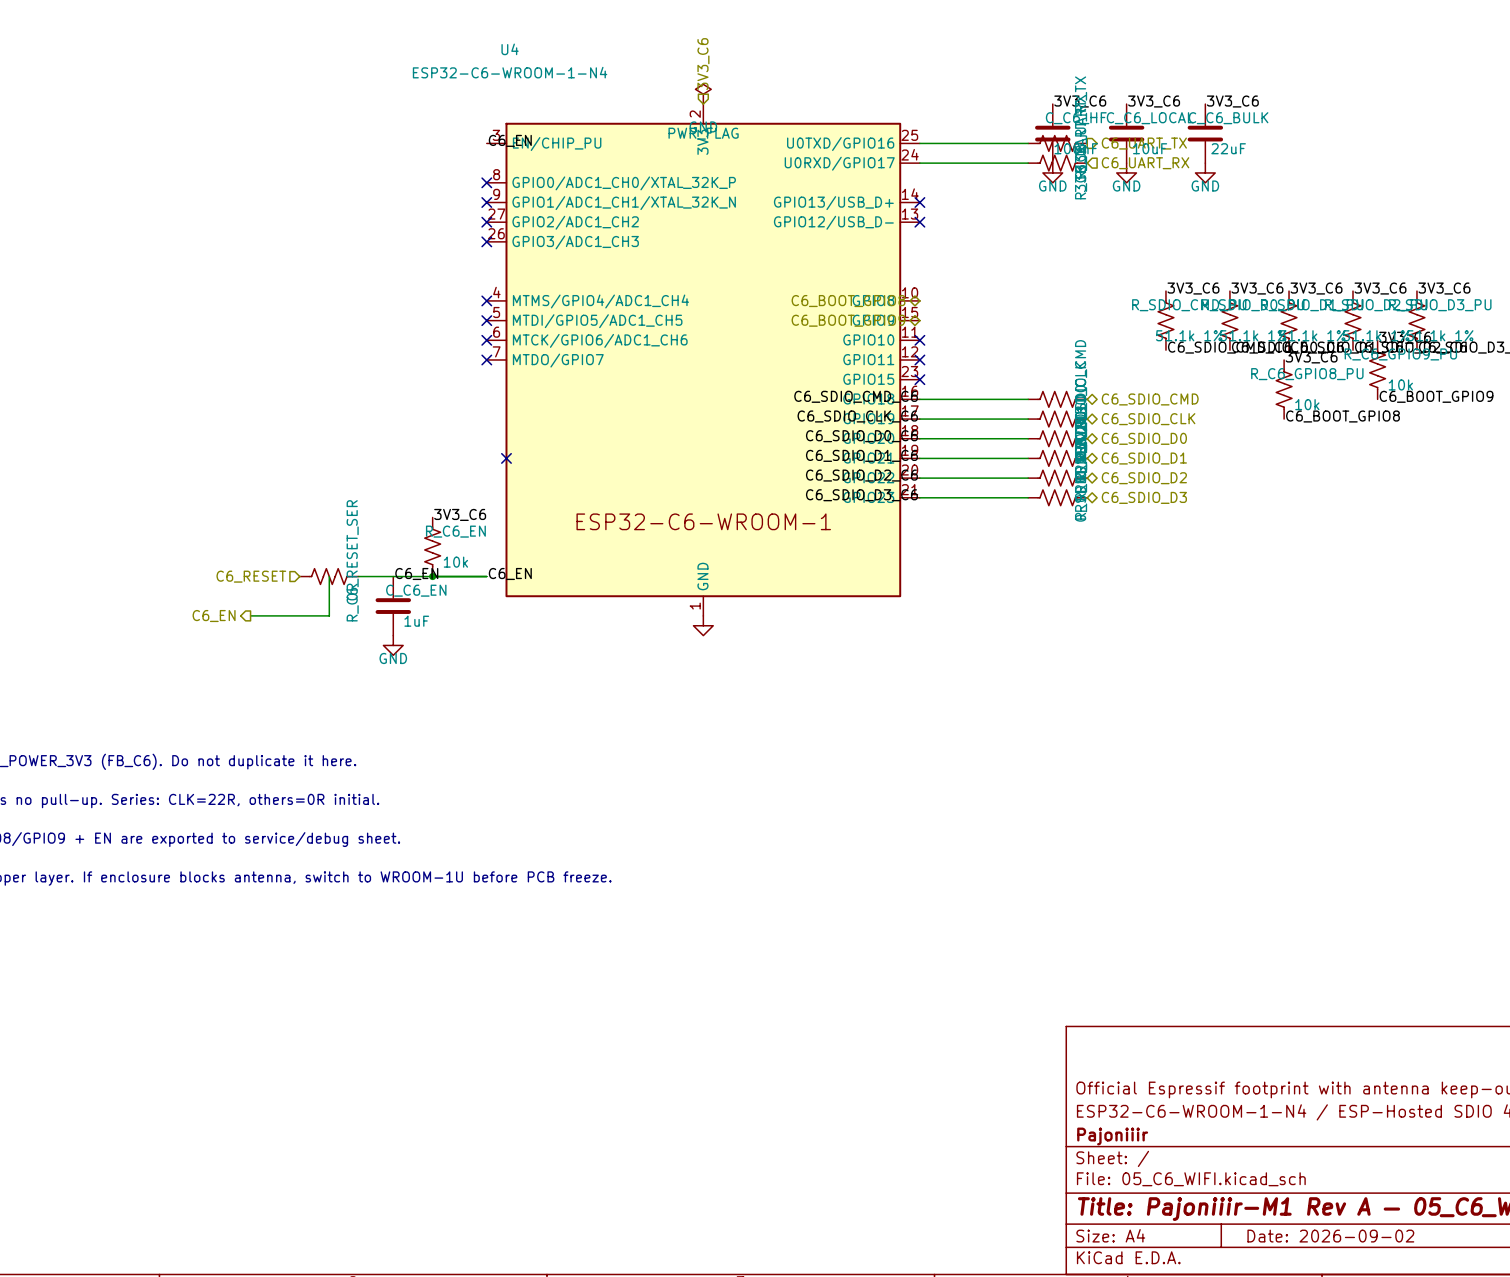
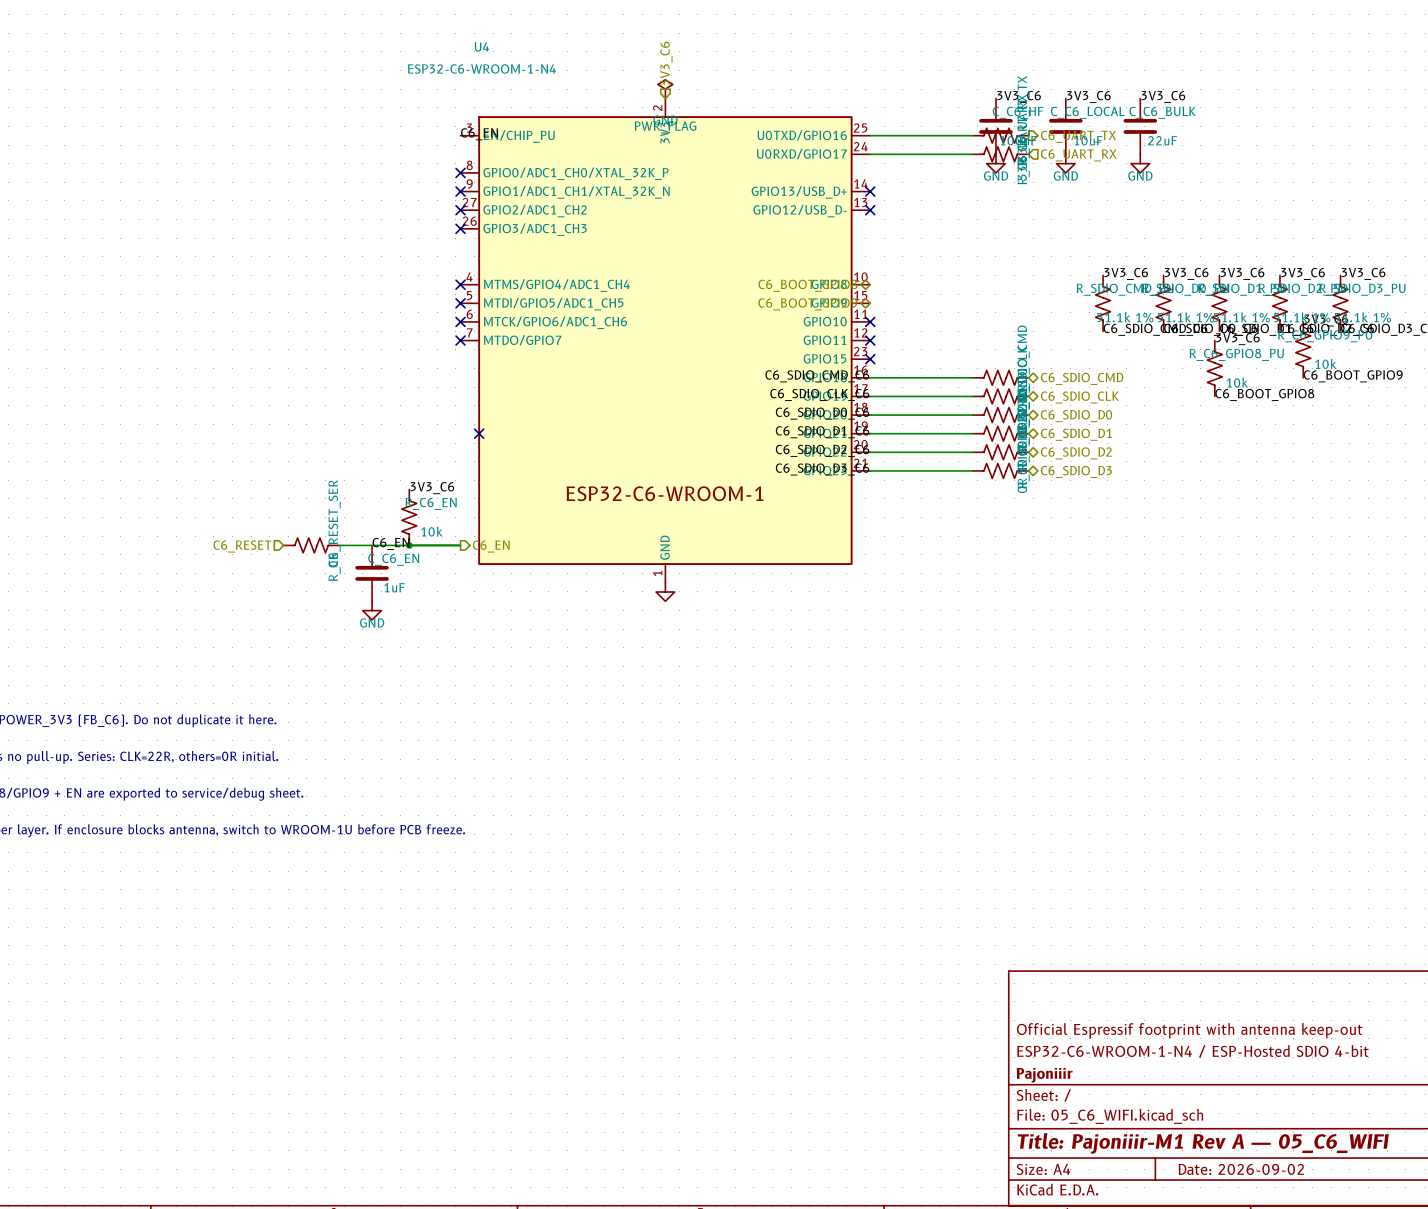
label: C6_EN (510, 573) -> none
wire: (329, 576) (329, 615) (250, 615) -> none
hierarchical label: none -> C6_EN (491, 546)
hierarchical label: C6_EN (214, 616) -> none

